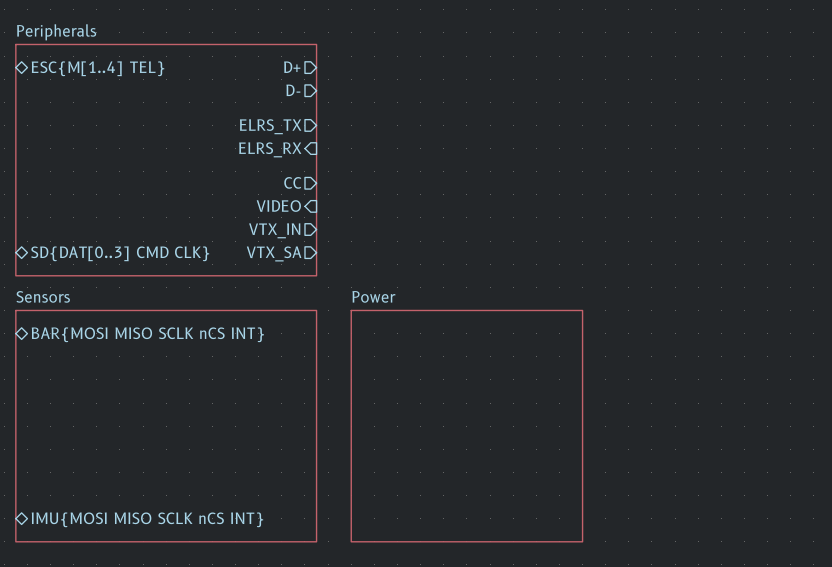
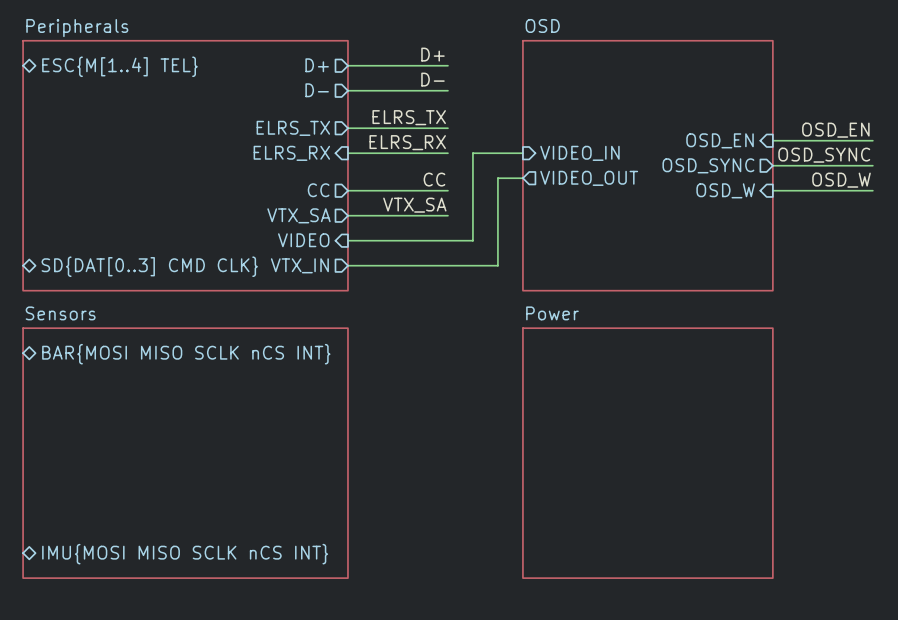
label: none -> D+ (432, 54)
wire: none -> (347, 65) (447, 65)
label: none -> D- (432, 79)
wire: none -> (347, 90) (447, 90)
label: none -> ELRS_TX (409, 117)
wire: none -> (347, 128) (447, 128)
label: none -> OSD_EN (835, 130)
wire: none -> (772, 140) (872, 140)
sheet pin: none -> OSD_EN (720, 140)
label: none -> ELRS_RX (407, 142)
wire: none -> (347, 153) (447, 153)
wire: none -> (522, 153) (472, 153) (472, 240) (347, 240)
sheet pin: none -> VIDEO_IN (579, 153)
label: none -> OSD_SYNC (824, 155)
sheet OSD: none -> (647, 165)
wire: none -> (772, 165) (872, 165)
sheet pin: none -> OSD_SYNC (708, 165)
wire: none -> (522, 178) (497, 178) (497, 265) (347, 265)
sheet pin: none -> VIDEO_OUT (589, 178)
label: none -> CC (434, 179)
label: none -> OSD_W (841, 180)
wire: none -> (347, 190) (447, 190)
wire: none -> (772, 190) (872, 190)
sheet pin: none -> OSD_W (725, 190)
label: none -> VTX_SA (414, 205)
sheet pin shape: input (278, 206) -> output (298, 215)
sheet pin: VIDEO (278, 206) -> VTX_SA (298, 215)
wire: none -> (347, 215) (447, 215)
sheet pin shape: output (274, 230) -> input (303, 240)
sheet pin: VTX_IN (274, 230) -> VIDEO (303, 240)
sheet pin: VTX_SA (274, 253) -> VTX_IN (299, 265)
sheet Power position: (466, 426) -> (647, 453)

